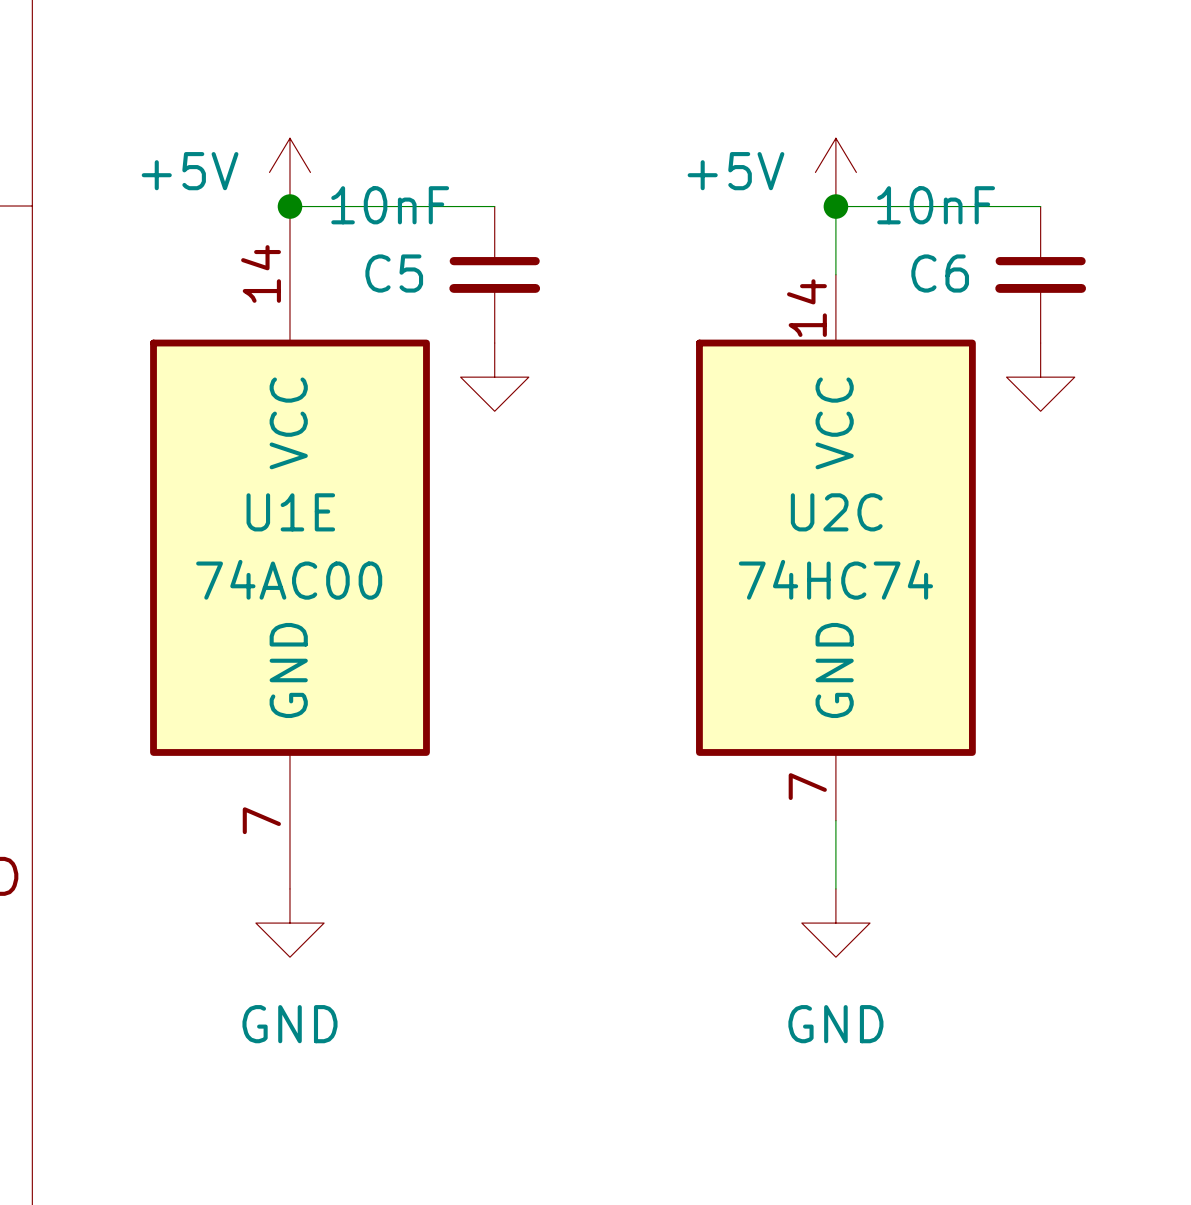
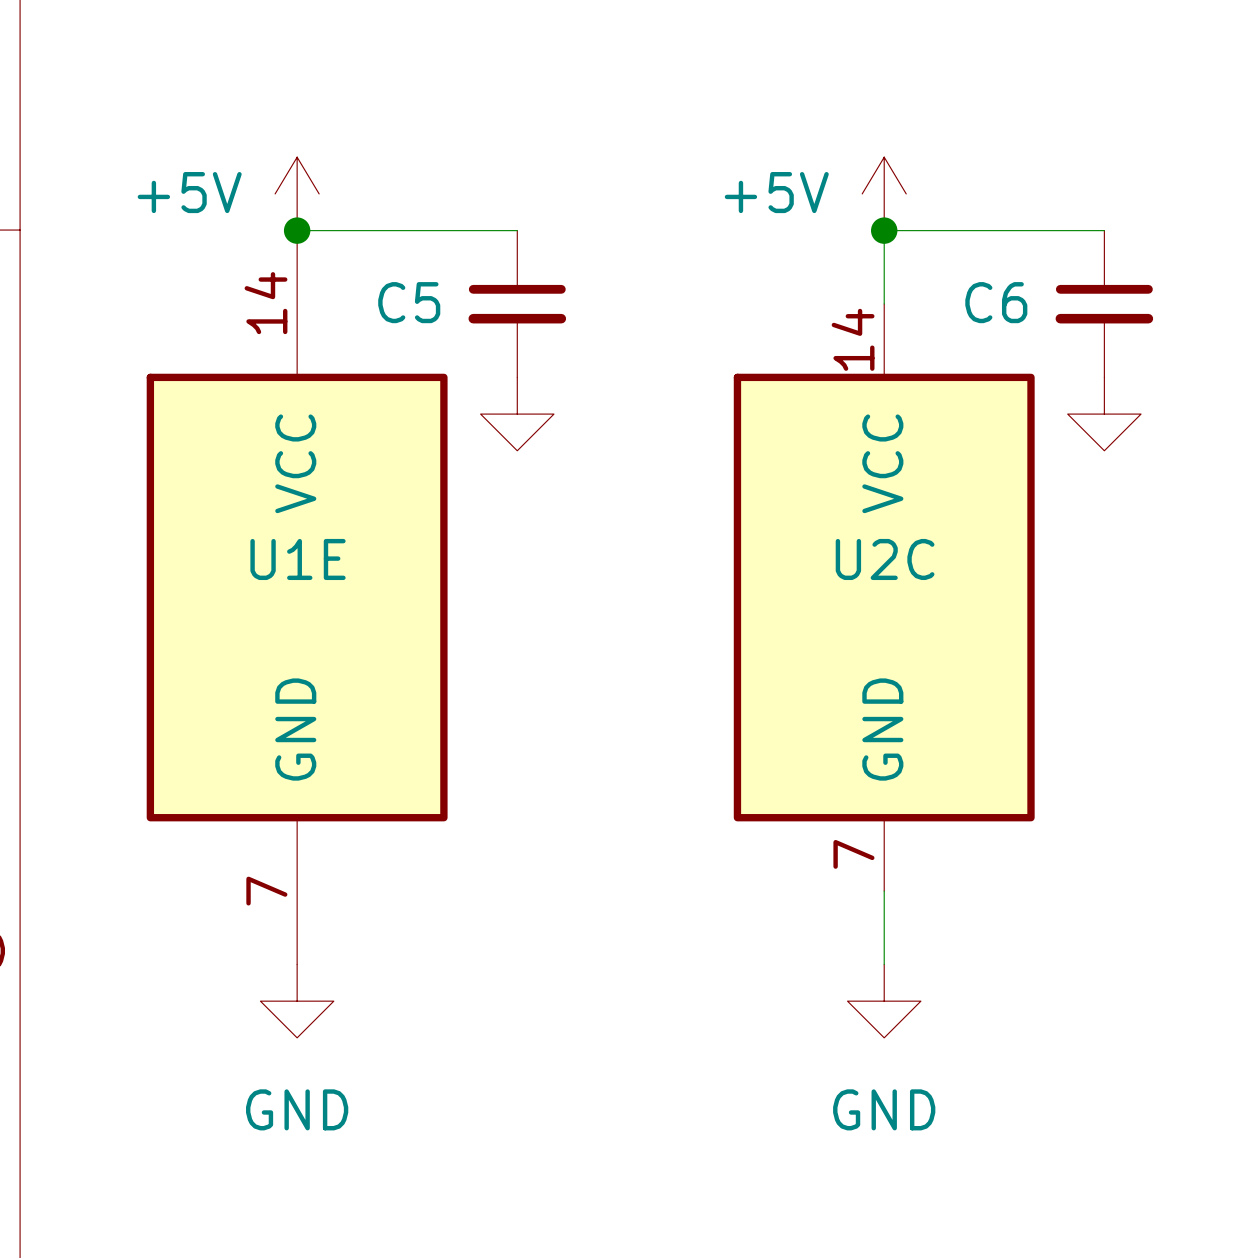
C5 value: 10nF (390, 205) -> none
C6 value: 10nF (936, 205) -> none
U1E value: 74AC00 (289, 579) -> none
U2C value: 74HC74 (835, 579) -> none

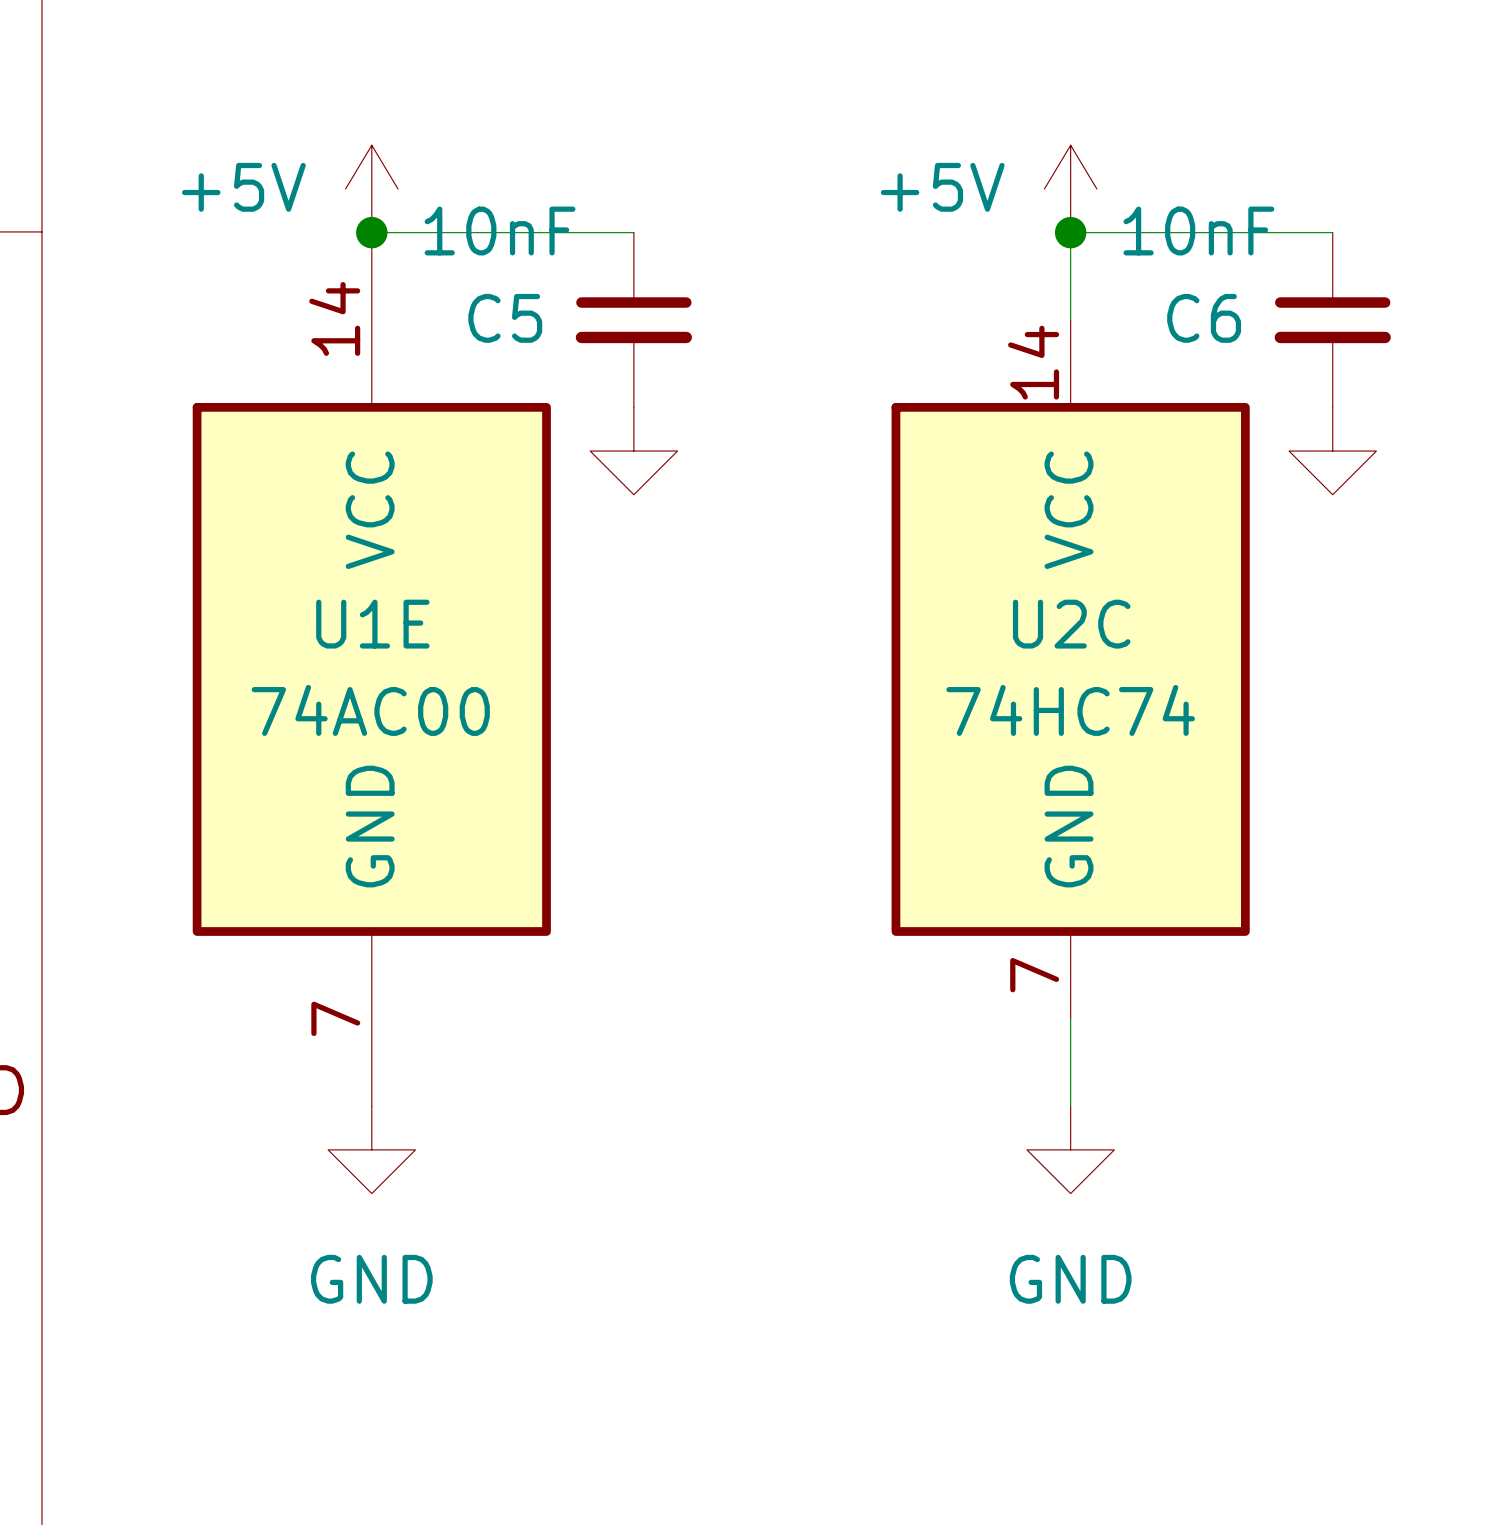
C5 value: none -> 10nF (500, 231)
C6 value: none -> 10nF (1198, 231)
U1E value: none -> 74AC00 (370, 710)
U2C value: none -> 74HC74 (1070, 710)

